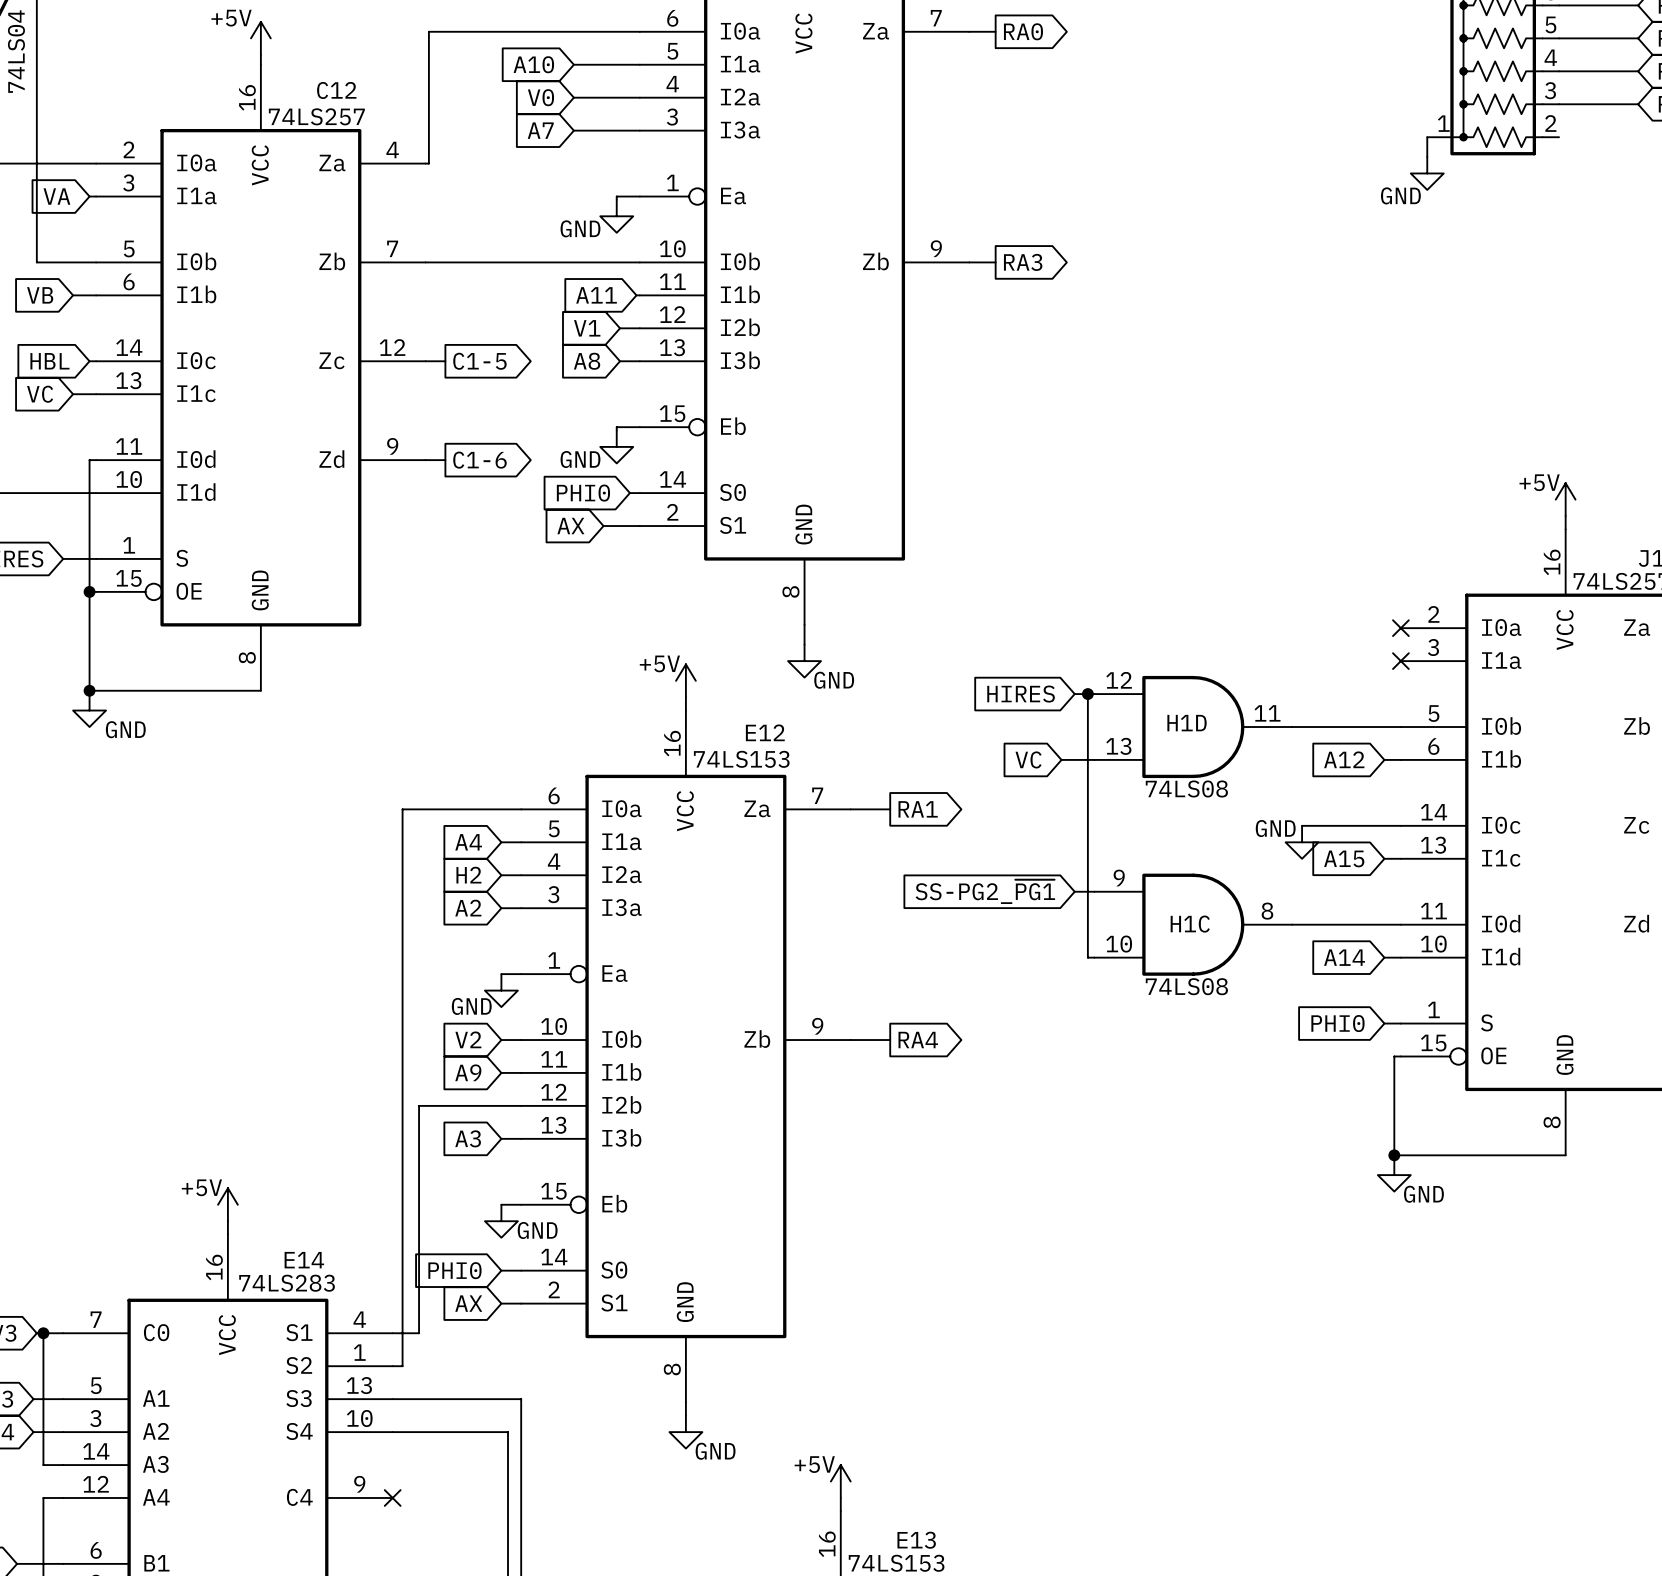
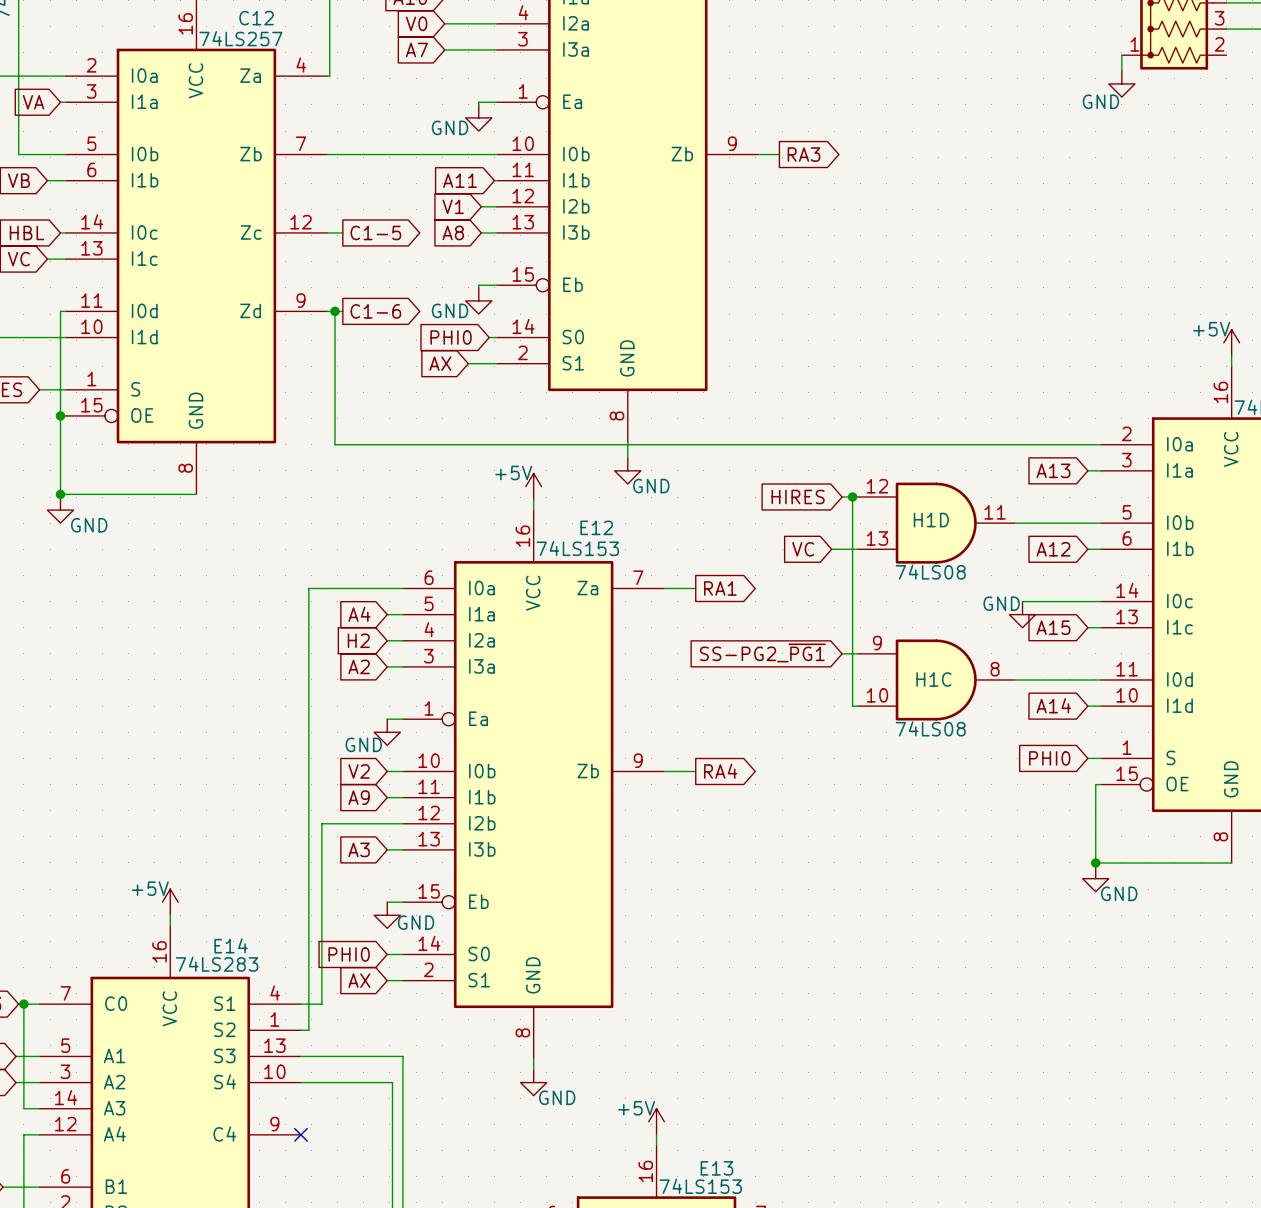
wire: none -> (334, 311) (334, 444) (1100, 444)
junction: none -> (334, 311)
no-connect mark: (1400, 628) -> none
global label: none -> A13 (1053, 470)
wire: none -> (1087, 470) (1100, 470)
no-connect mark: (1400, 661) -> none

